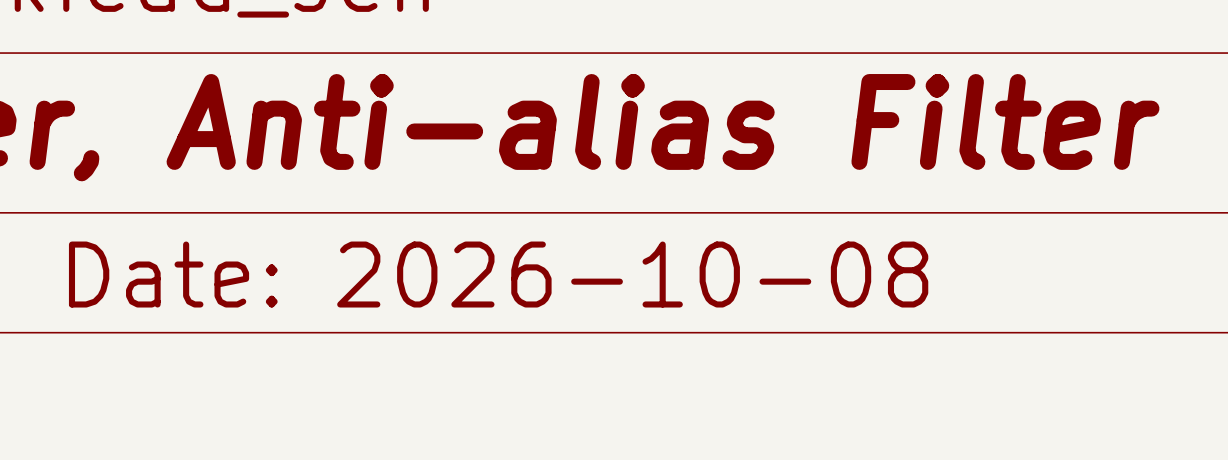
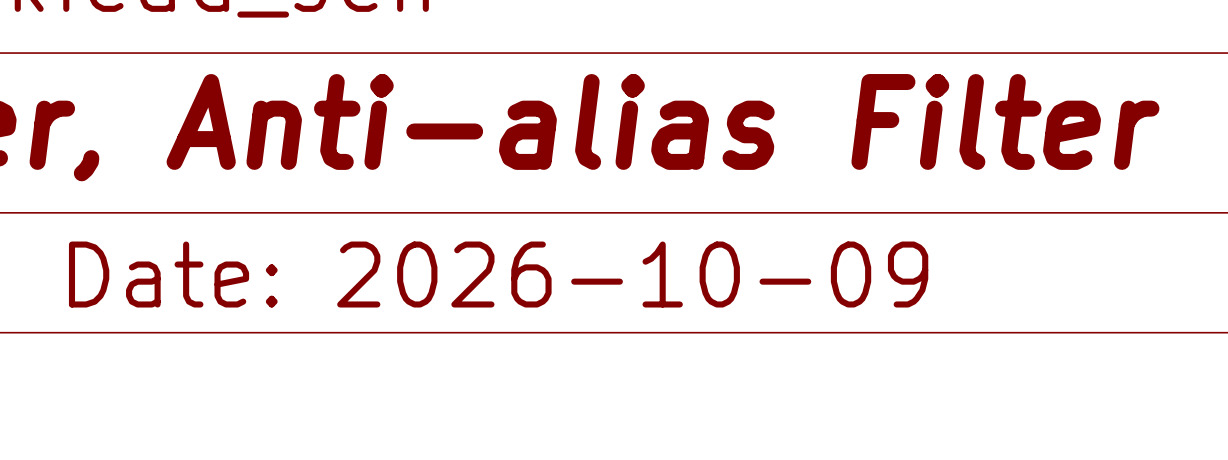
title block: Date: 2026-10-08 (498, 274) -> Date: 2026-10-09 (498, 274)

